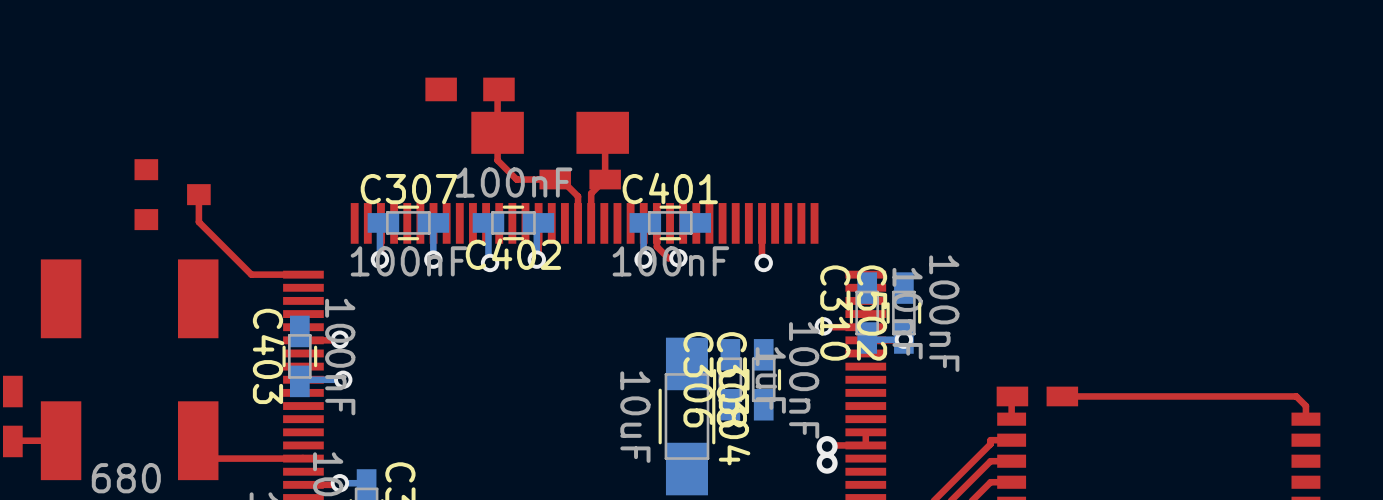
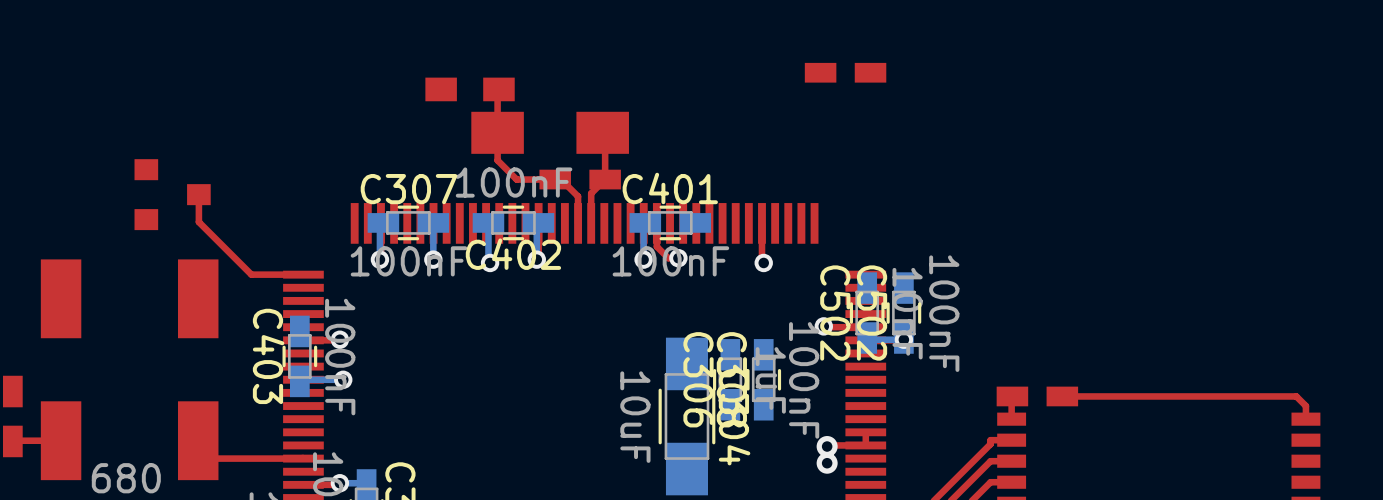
part: none -> (845, 72)
C310 name: C310 (835, 313) -> C502 (835, 313)

